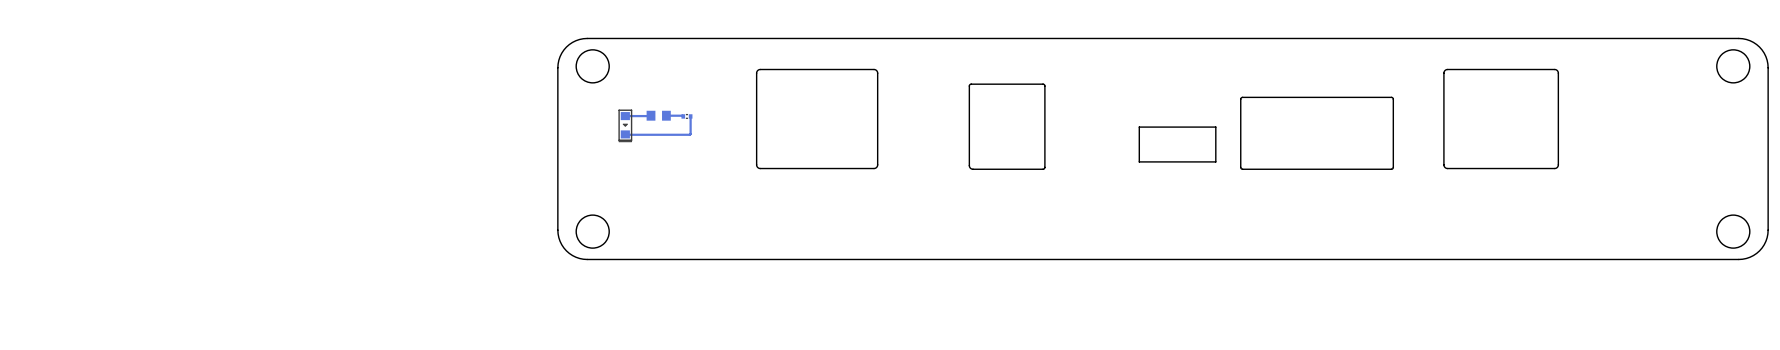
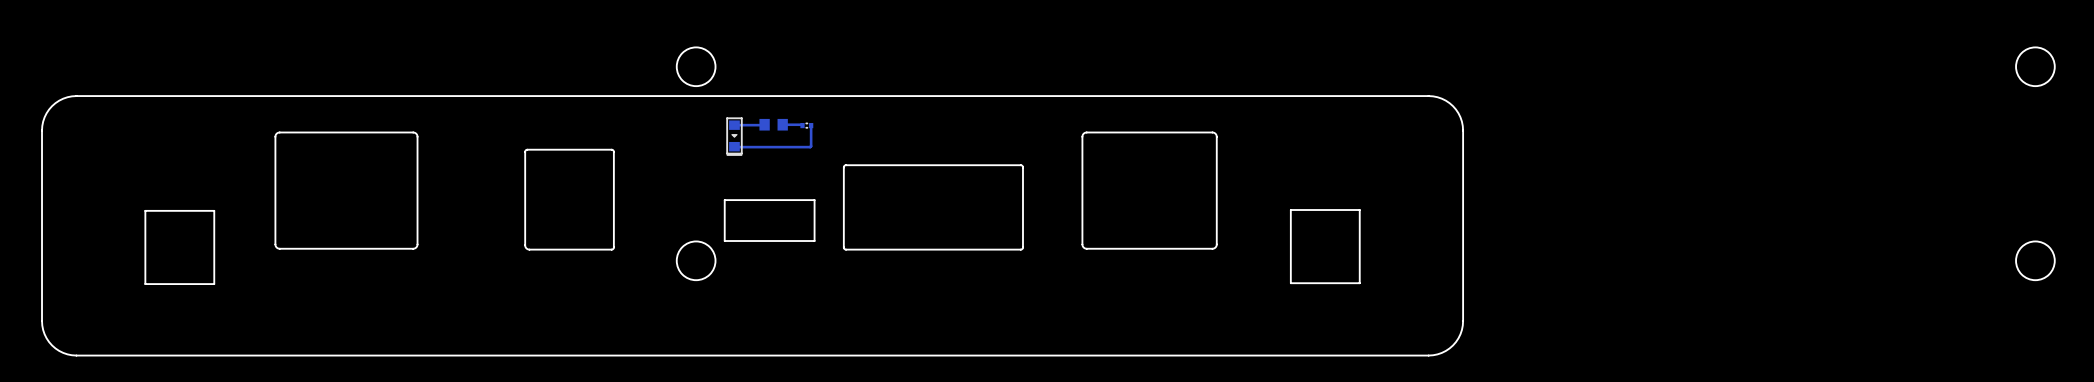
board edge: (1738, 38) (583, 38) (566, 47) (558, 63) (558, 233) (566, 250) (575, 257) (587, 259) (1742, 259) (1759, 250) (1767, 233) (1768, 67) (1765, 56) (1759, 47) (1750, 40) (1738, 38) -> none
board edge: (874, 69) (758, 70) (757, 167) (876, 167) (877, 73) (874, 69) -> none
board edge: (1554, 69) (1445, 70) (1445, 167) (1557, 167) (1558, 73) (1554, 69) -> none
board edge: (1043, 84) (969, 84) (970, 168) (1044, 168) (1044, 86) (1043, 84) -> none
board edge: none -> (1428, 96) (71, 96) (59, 100) (52, 106) (46, 113) (42, 126) (42, 325) (46, 338) (52, 345) (63, 352) (76, 355) (1433, 355) (1445, 350) (1453, 345) (1458, 338) (1462, 325) (1463, 130) (1460, 117) (1453, 106) (1441, 98) (1428, 96)
board edge: (1391, 97) (1241, 97) (1240, 168) (1392, 169) (1393, 99) (1391, 97) -> none
board edge: none -> (413, 132) (277, 133) (275, 136) (276, 247) (279, 248) (415, 247) (417, 244) (417, 136) (413, 132)
board edge: none -> (1212, 132) (1083, 133) (1083, 247) (1215, 247) (1216, 136) (1212, 132)
board edge: (1215, 127) (1139, 127) (1139, 161) (1215, 161) (1215, 127) -> none
board edge: none -> (611, 149) (525, 150) (525, 245) (526, 248) (613, 248) (613, 151) (611, 149)
board edge: none -> (1020, 165) (845, 165) (844, 248) (1021, 249) (1022, 167) (1020, 165)
board edge: none -> (814, 200) (724, 200) (724, 241) (814, 241) (814, 200)
board edge: none -> (1359, 210) (1359, 283) (1290, 283) (1290, 210) (1359, 210)
board edge: none -> (214, 210) (214, 284) (145, 284) (145, 210) (214, 210)

